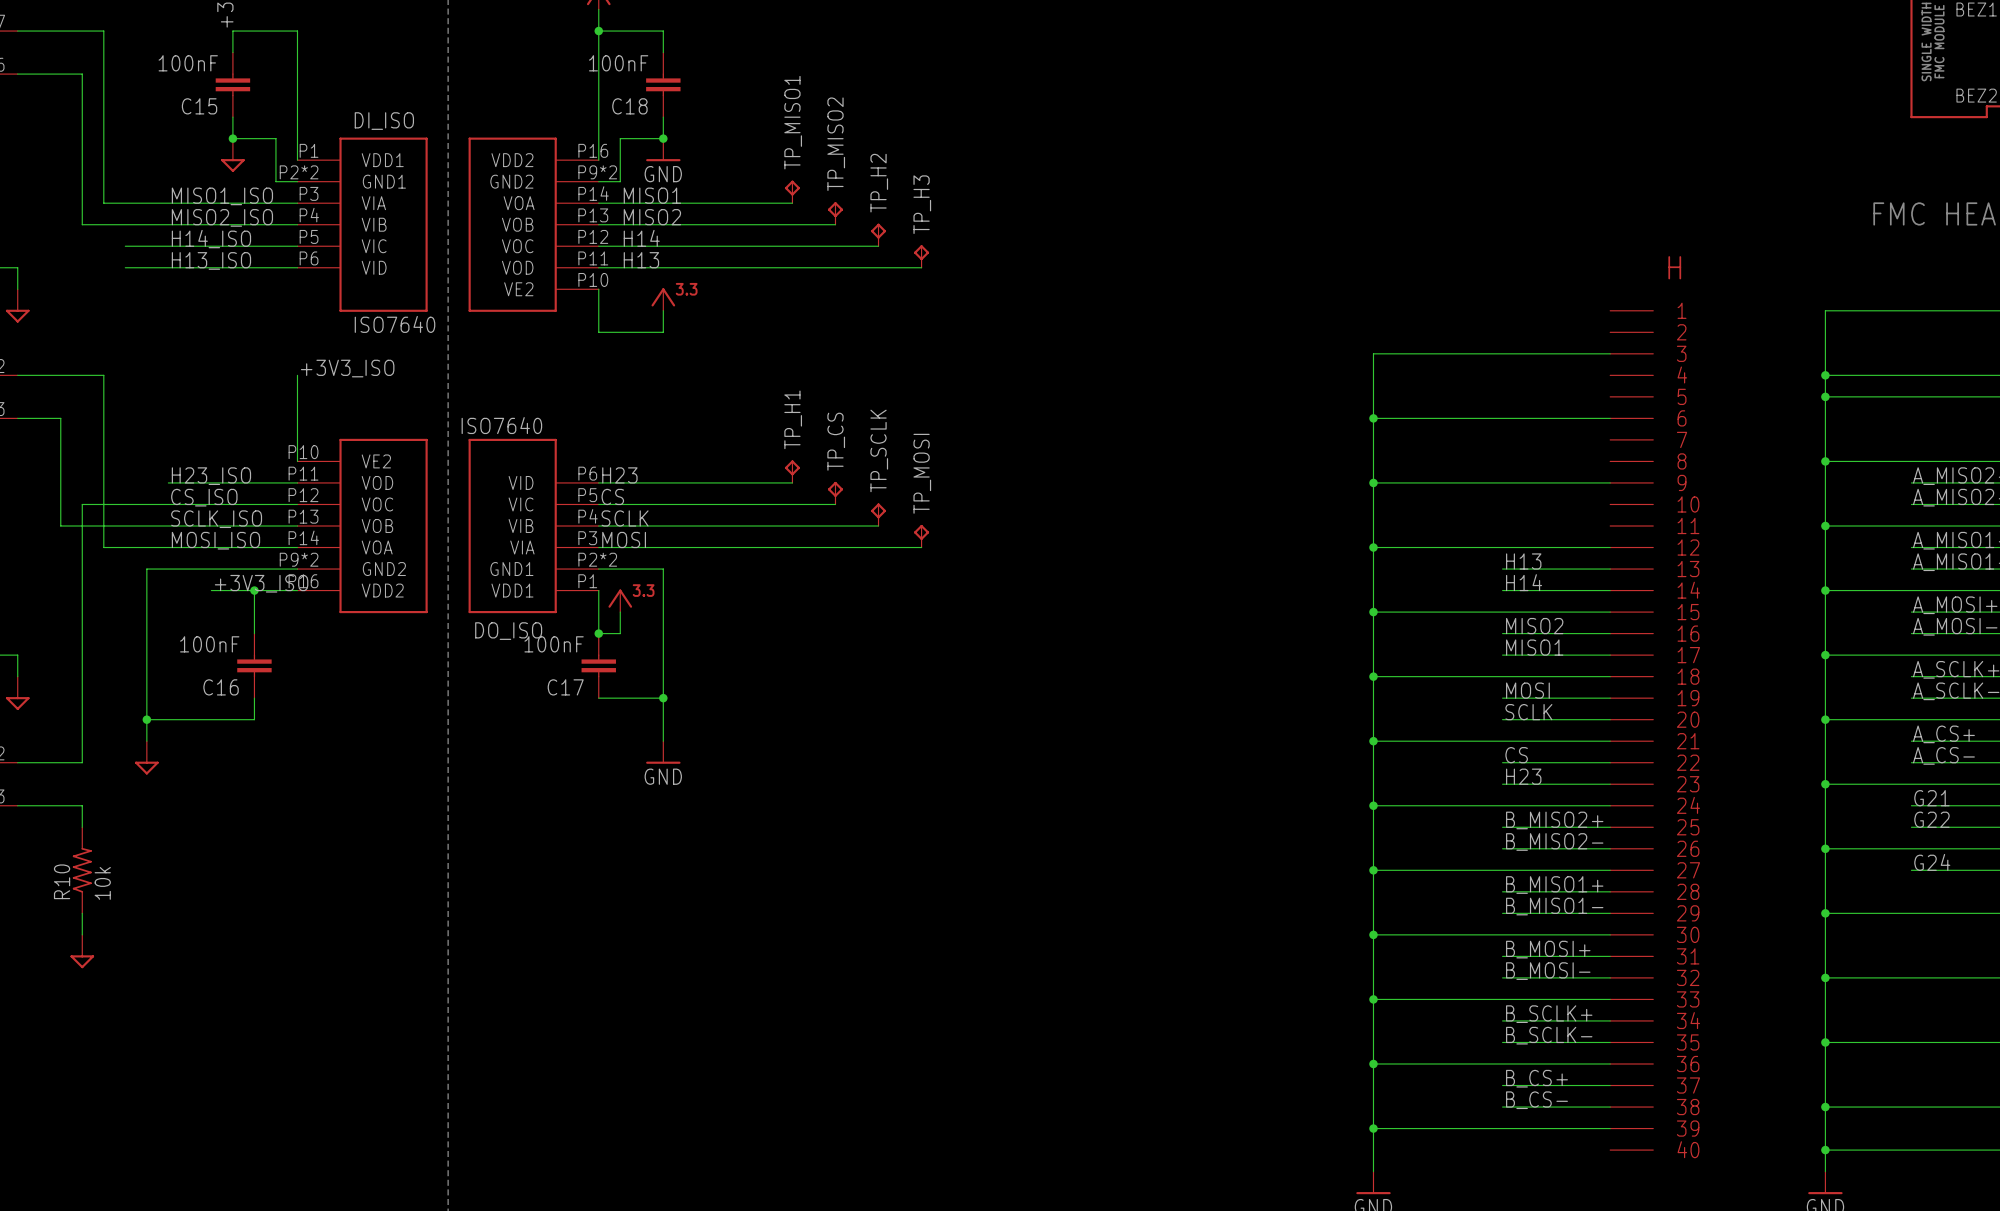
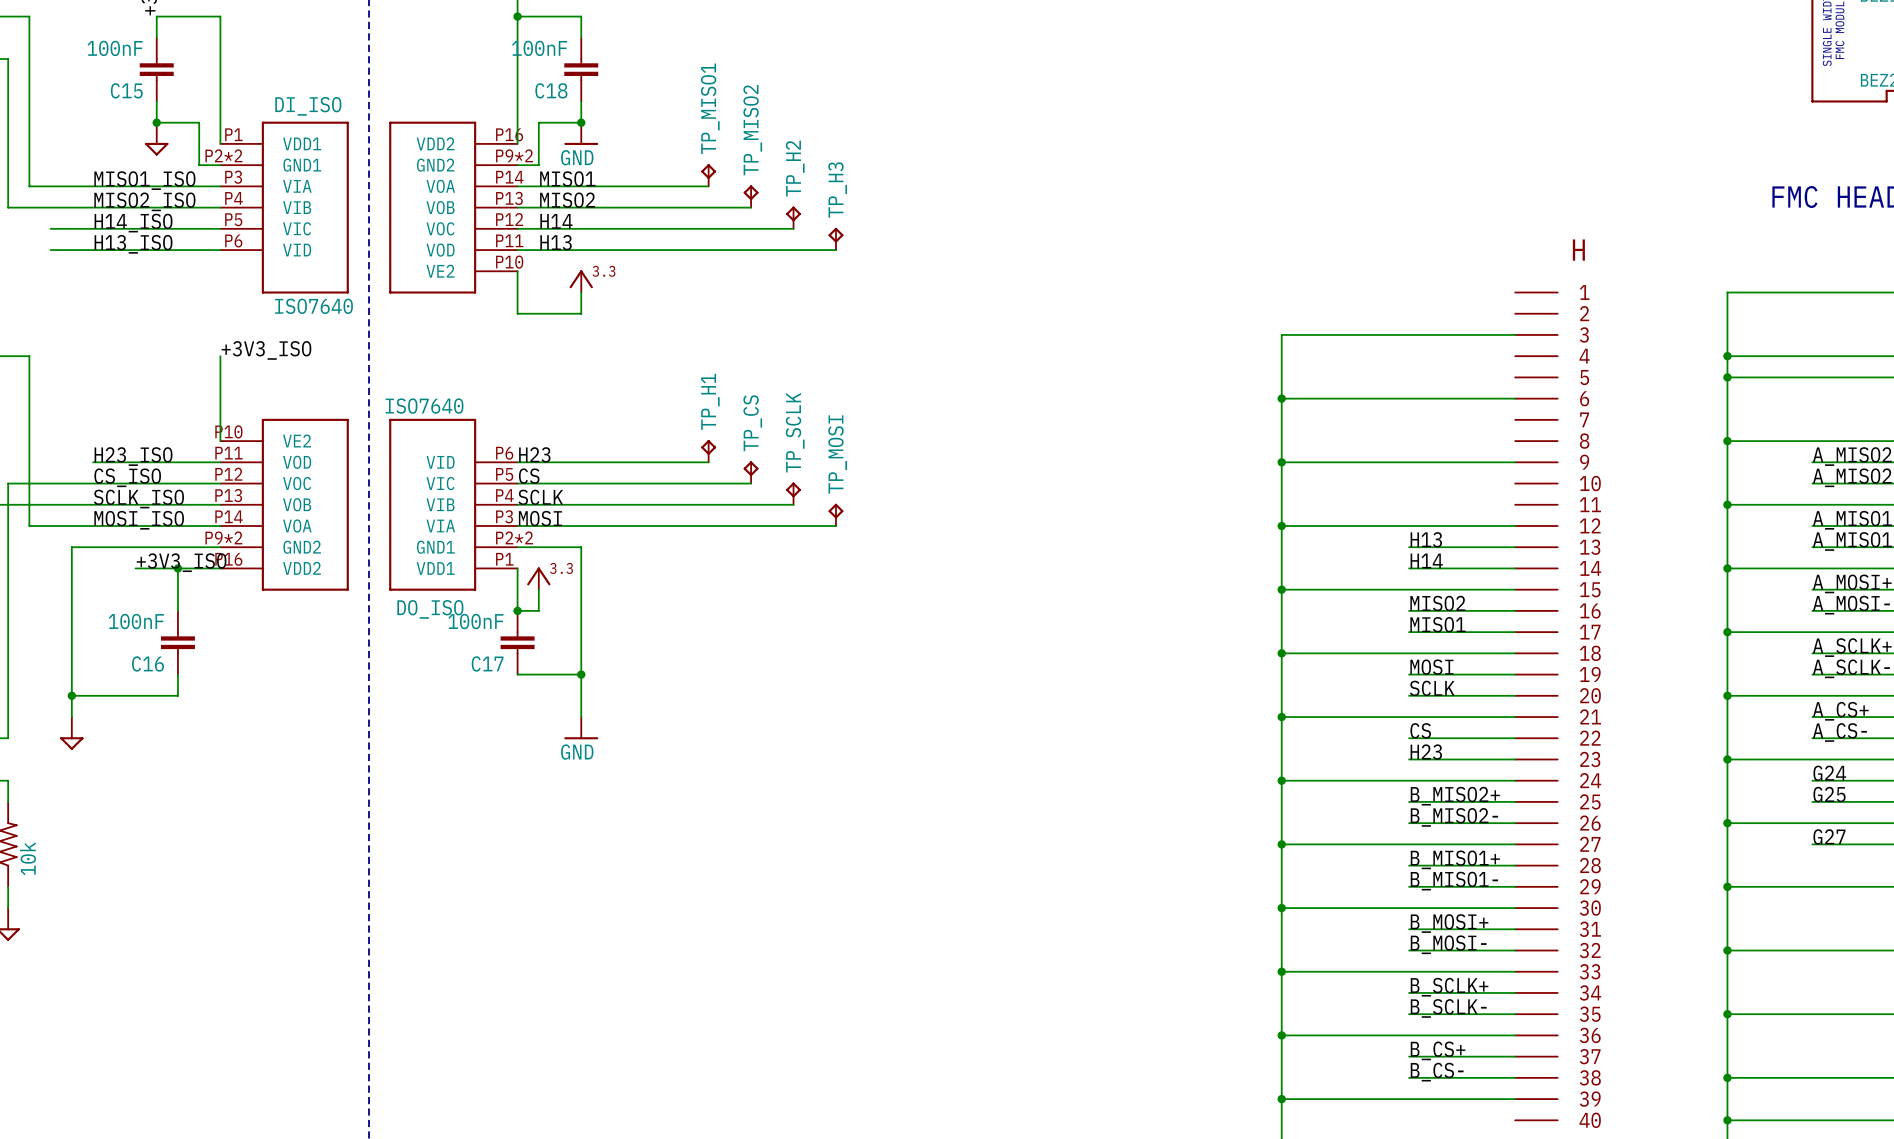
label: G21 (1931, 798) -> G24 (1829, 773)
label: G22 (1931, 819) -> G25 (1829, 794)
label: G24 (1932, 862) -> G27 (1829, 836)

